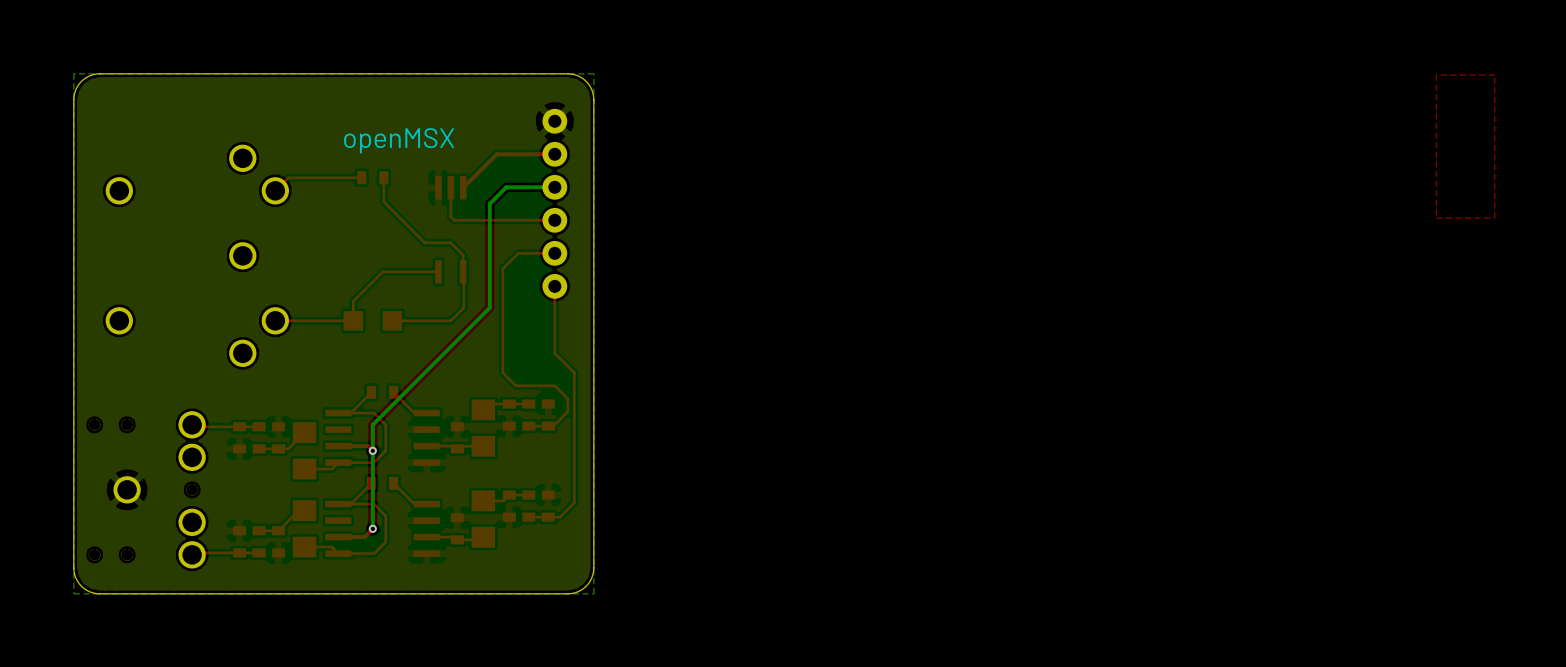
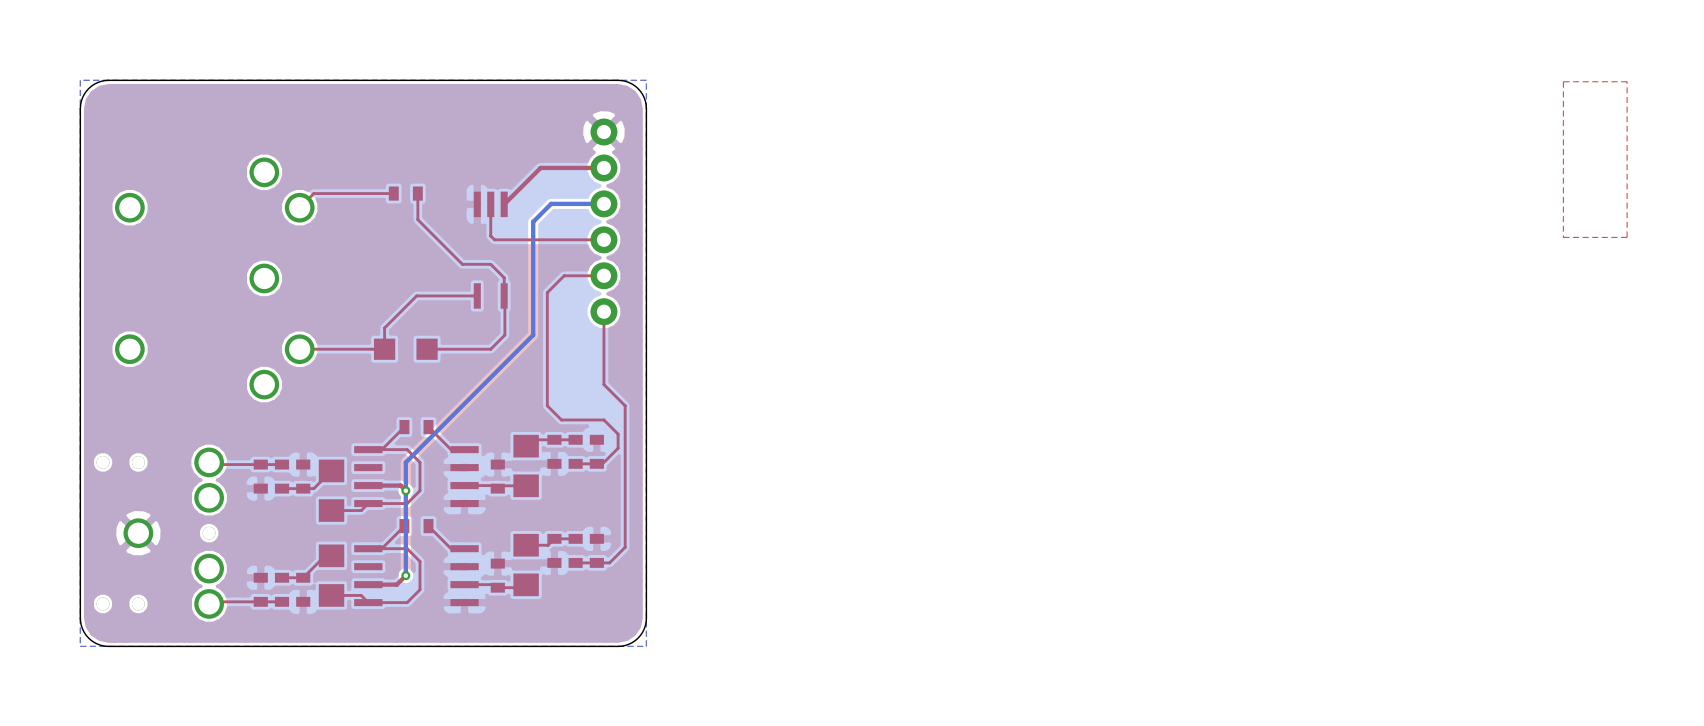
text: openMSX (399, 140) -> none

